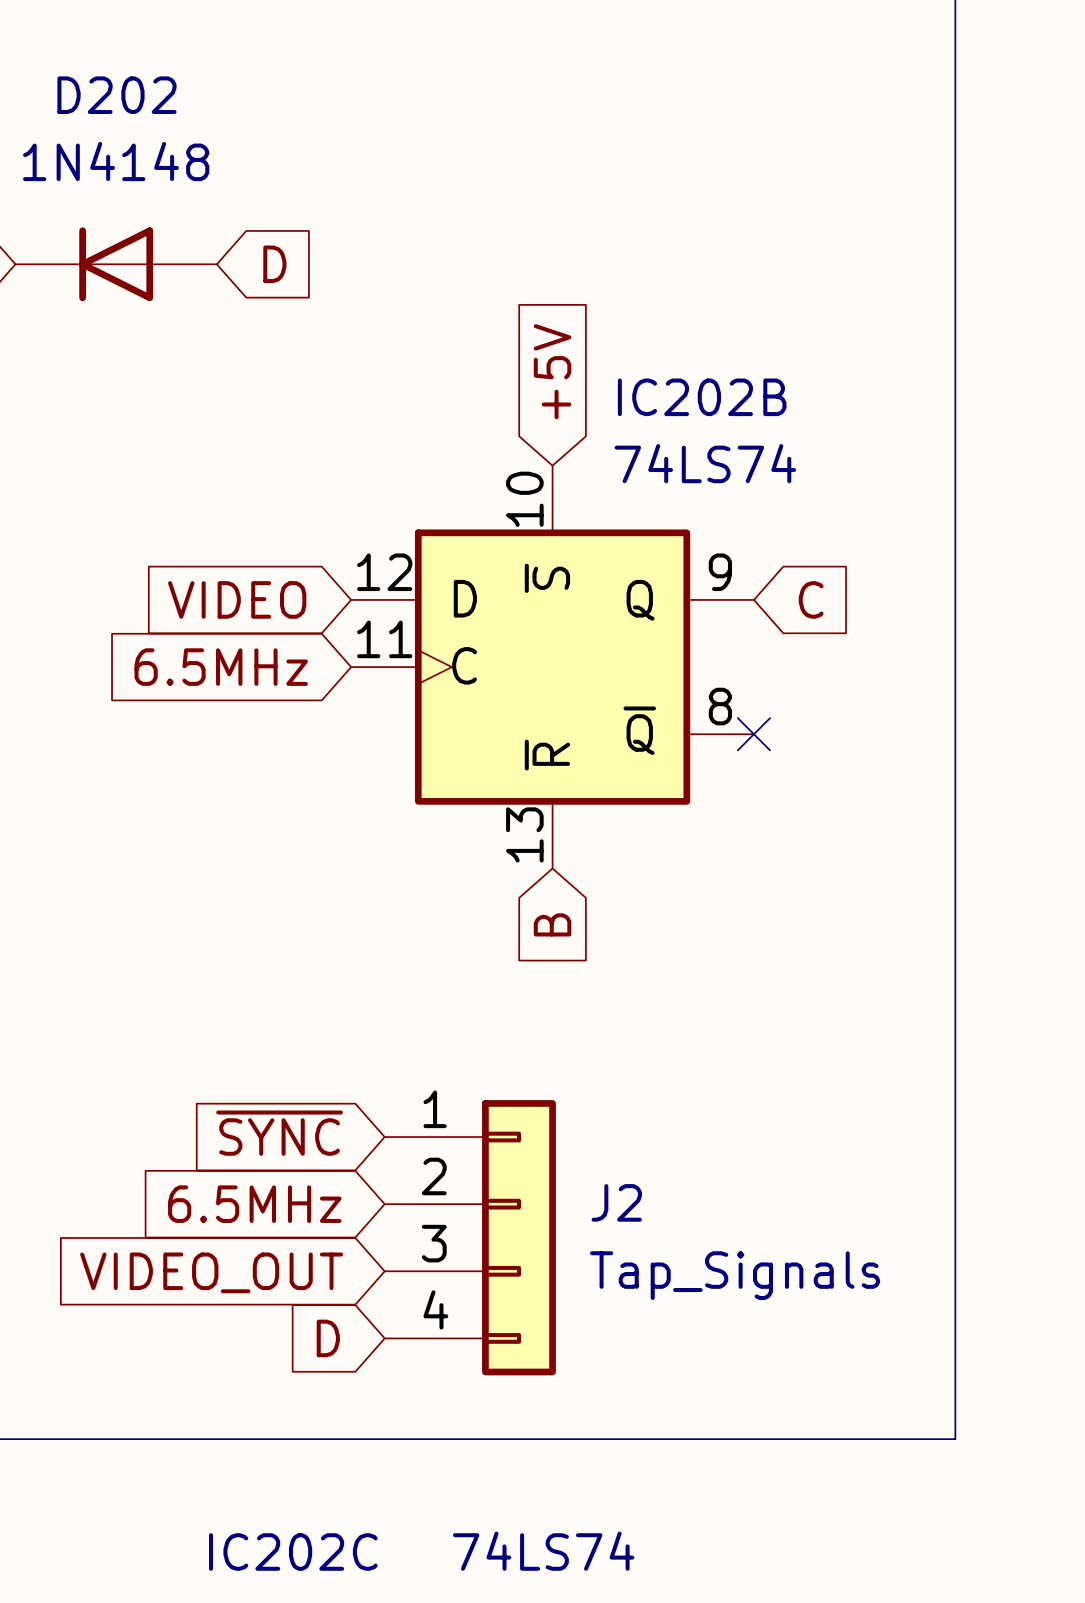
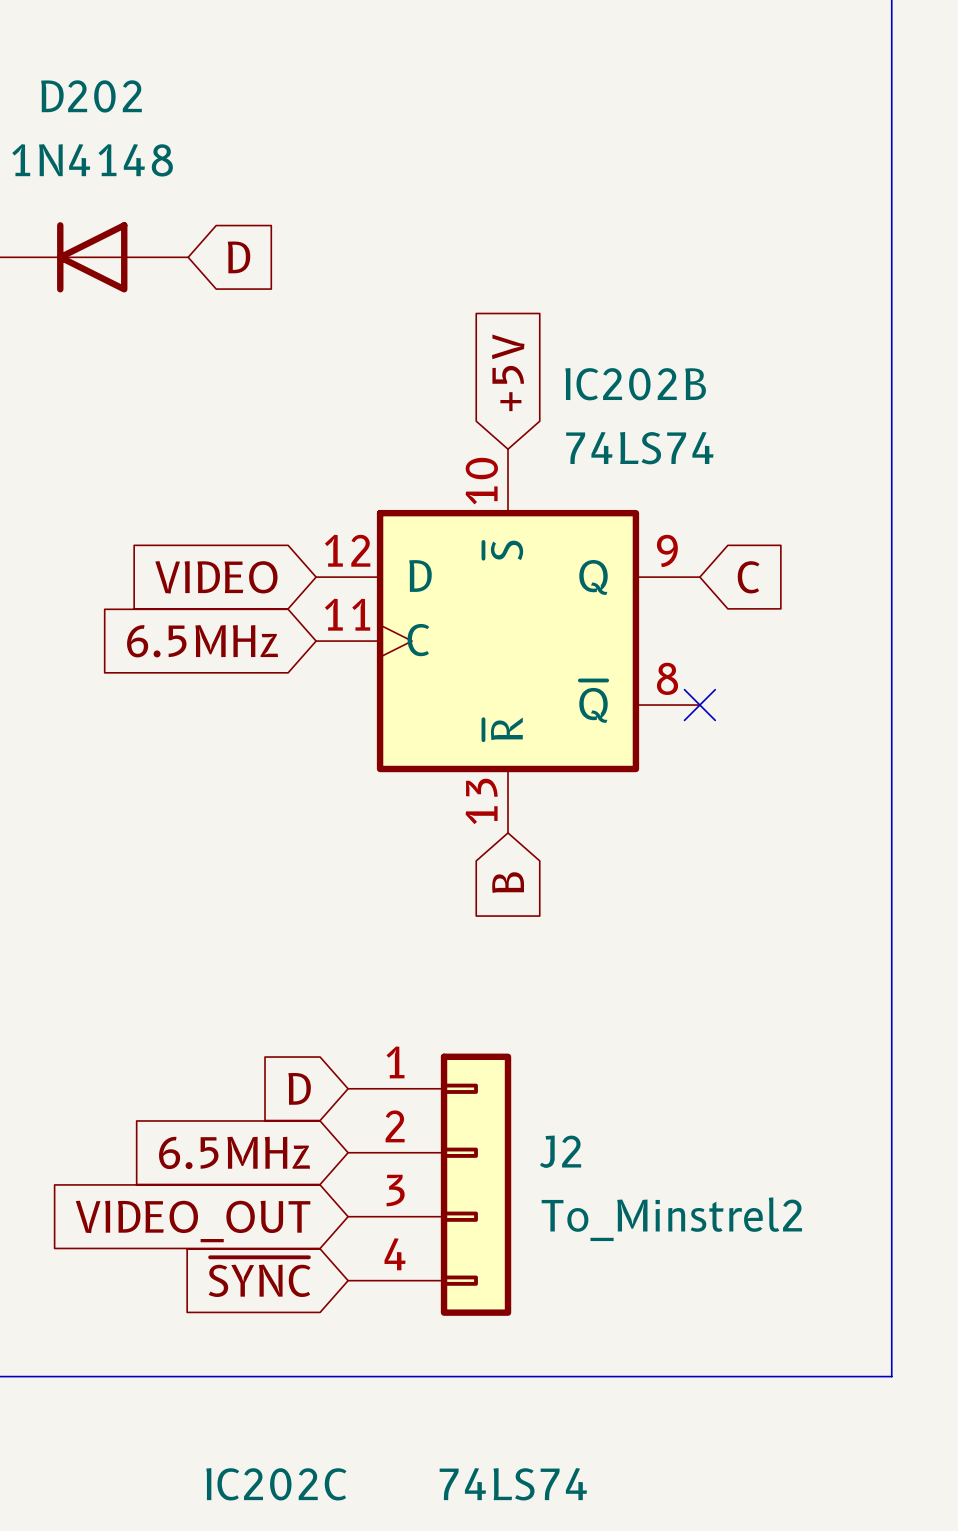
global label: ~{SYNC} (279, 1133) -> D (299, 1088)
J2 value: Tap_Signals (735, 1275) -> To_Minstrel2 (671, 1219)
global label: D (328, 1338) -> ~{SYNC} (259, 1277)

